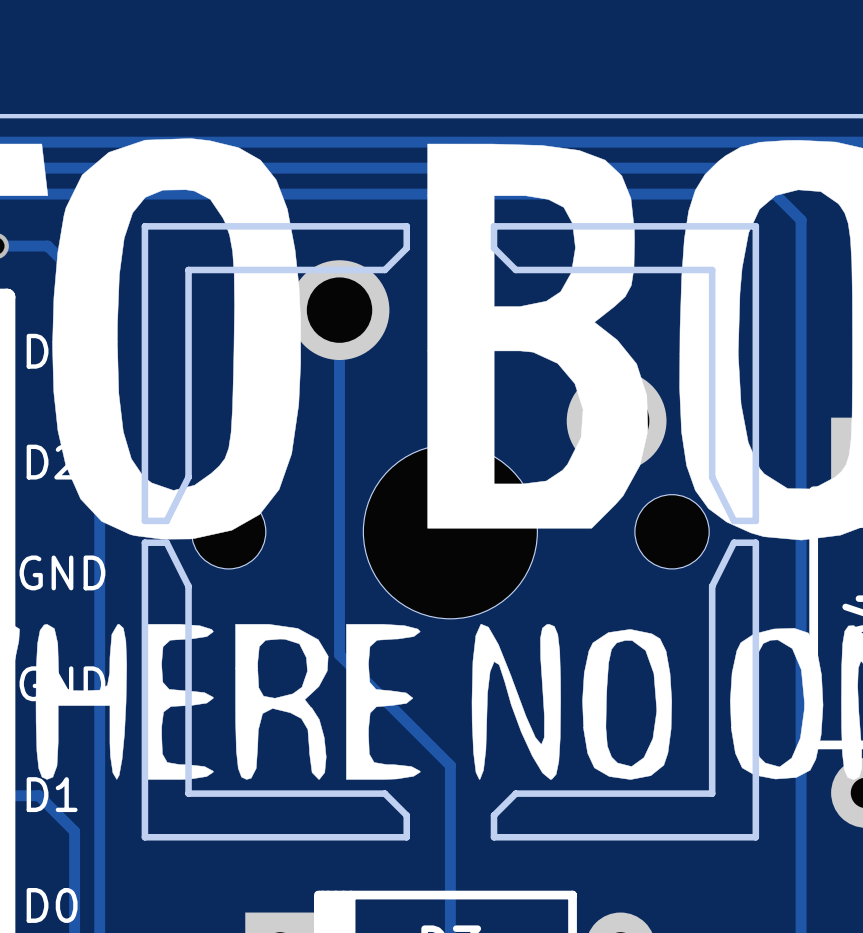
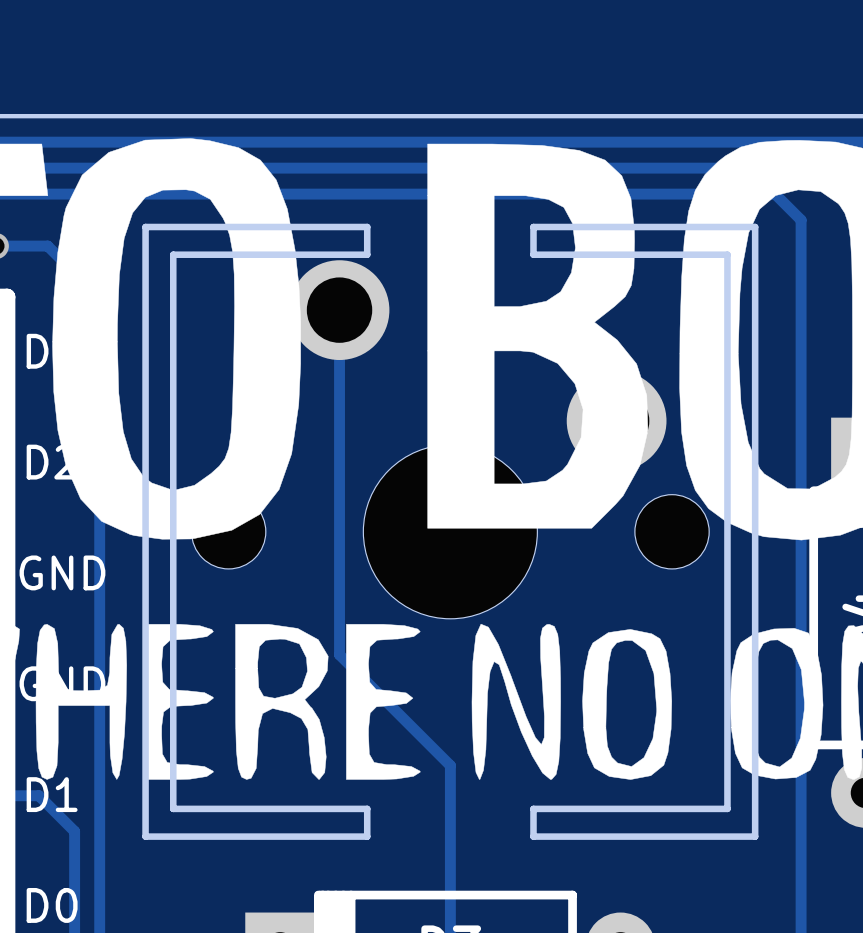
part footprint: [141, 223, 760, 841] -> [142, 223, 759, 840]

